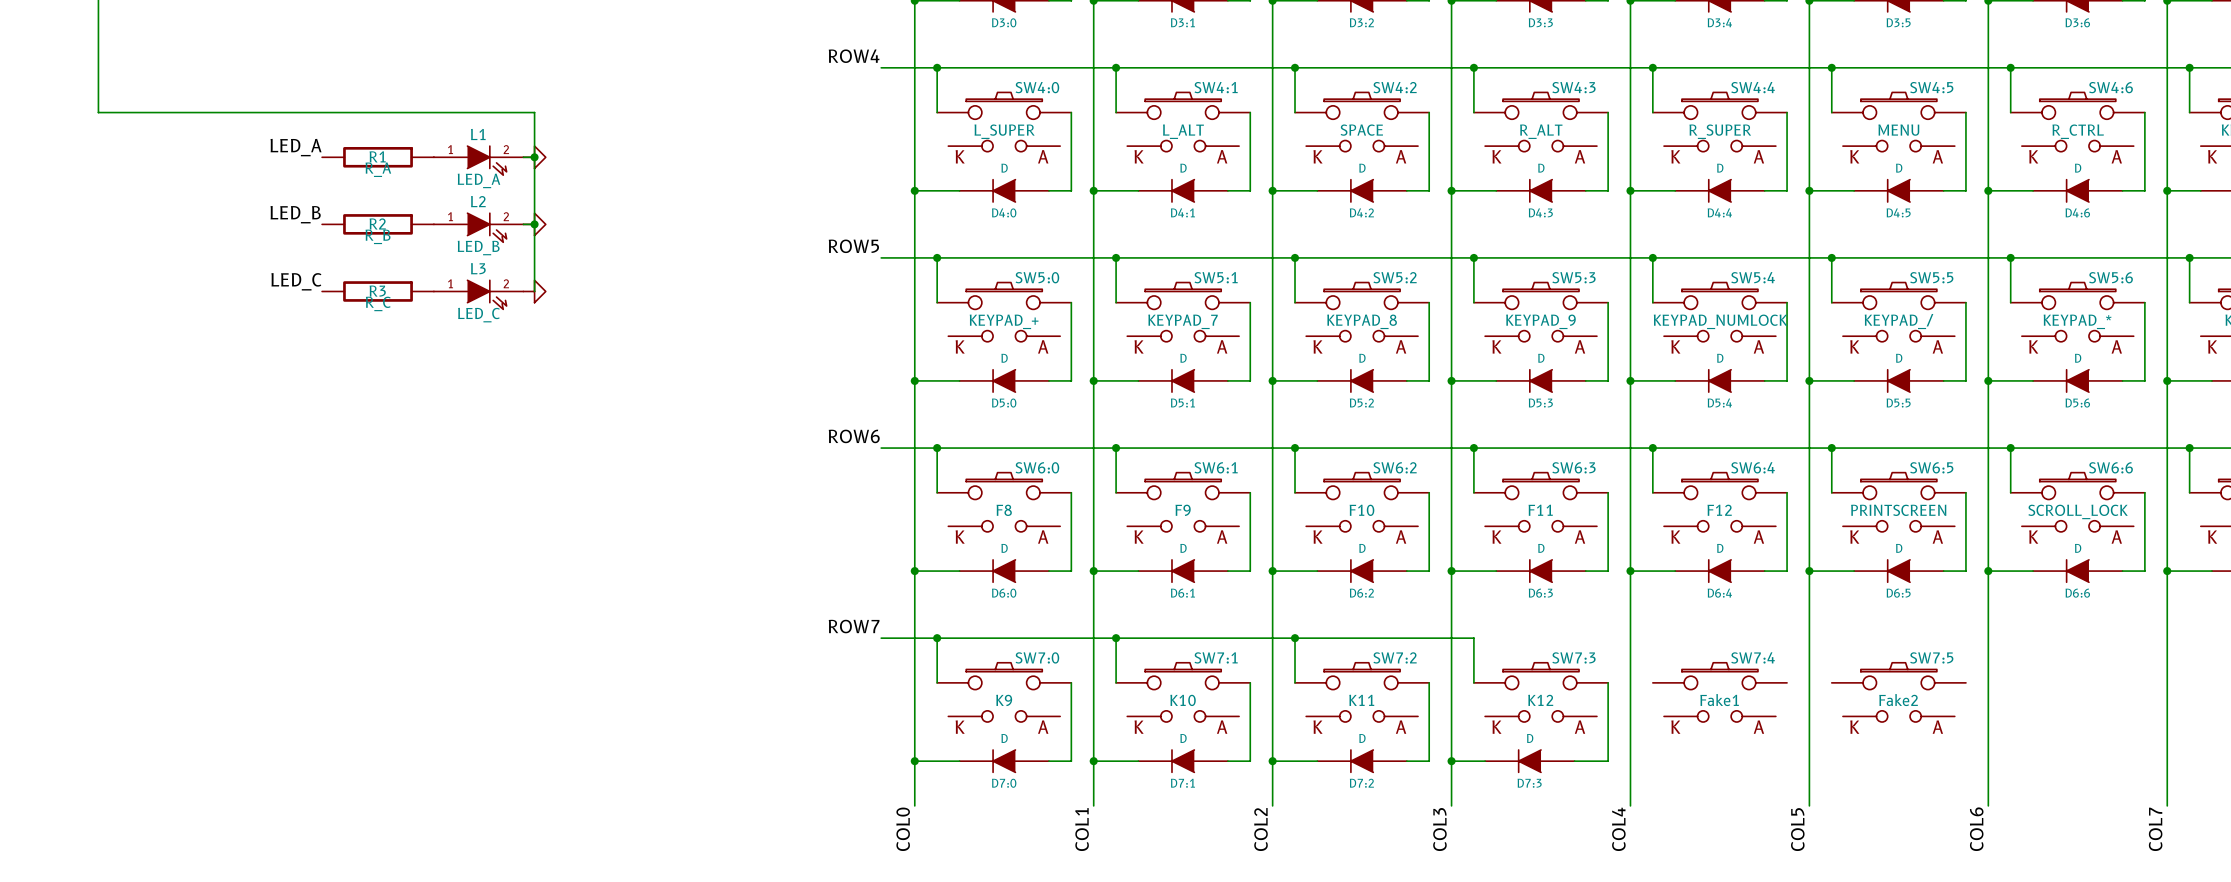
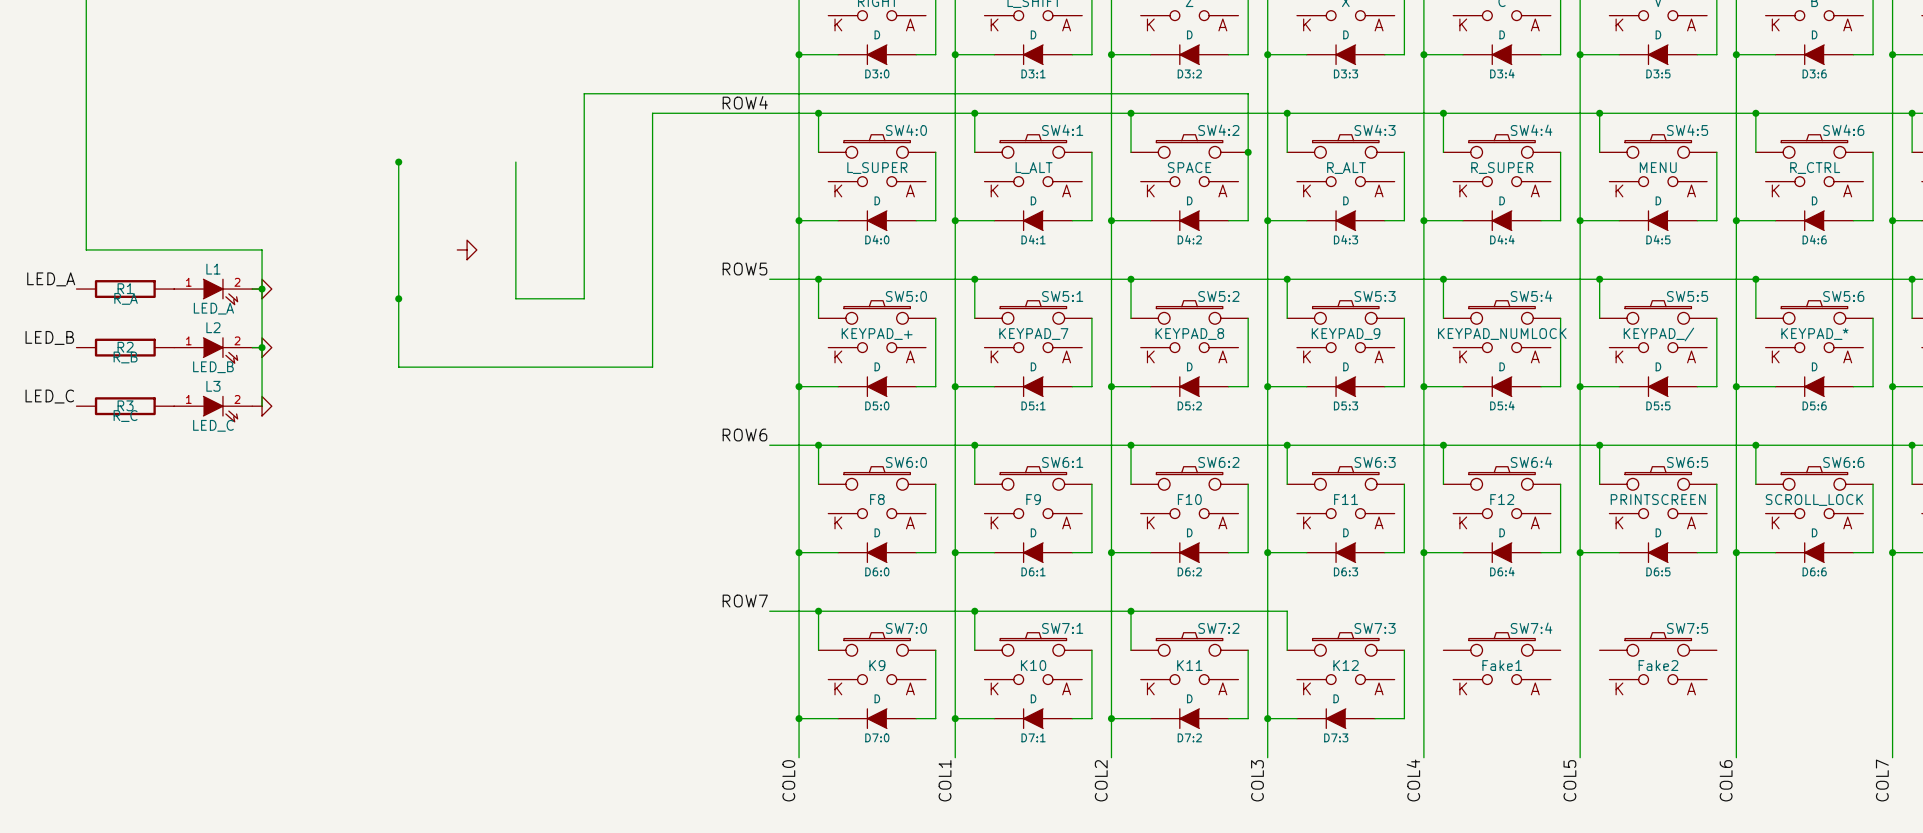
wire: none -> (769, 113) (652, 113) (652, 367) (398, 367) (398, 162)
wire: (98, 112) (534, 112) (534, 291) -> (86, 152) (86, 249) (262, 249) (262, 406)
wire: none -> (1248, 152) (1248, 93) (584, 93) (584, 298) (515, 298) (515, 162)
junction: none -> (1248, 152)
junction: none -> (398, 162)
label: LED_A (296, 147) -> none
R1 position: (378, 157) -> (125, 289)
wire: (523, 157) (534, 157) -> none
power symbol: (534, 157) -> none
junction: (534, 157) -> none
L1 position: (478, 160) -> (213, 291)
label: LED_B (295, 214) -> none
R2 position: (378, 224) -> (125, 347)
junction: (534, 224) -> none
L2 position: (478, 227) -> (213, 350)
label: none -> LED_A (51, 279)
wire: none -> (252, 289) (262, 289)
power symbol: none -> (262, 289)
junction: none -> (262, 289)
junction: none -> (398, 298)
label: LED_C (296, 281) -> none
R3 position: (378, 291) -> (125, 406)
power symbol: (534, 291) -> none
L3 position: (478, 294) -> (213, 409)
label: none -> LED_B (49, 337)
wire: none -> (252, 347) (262, 347)
power symbol: none -> (262, 347)
junction: none -> (262, 347)
label: none -> LED_C (49, 396)
power symbol: none -> (262, 406)

